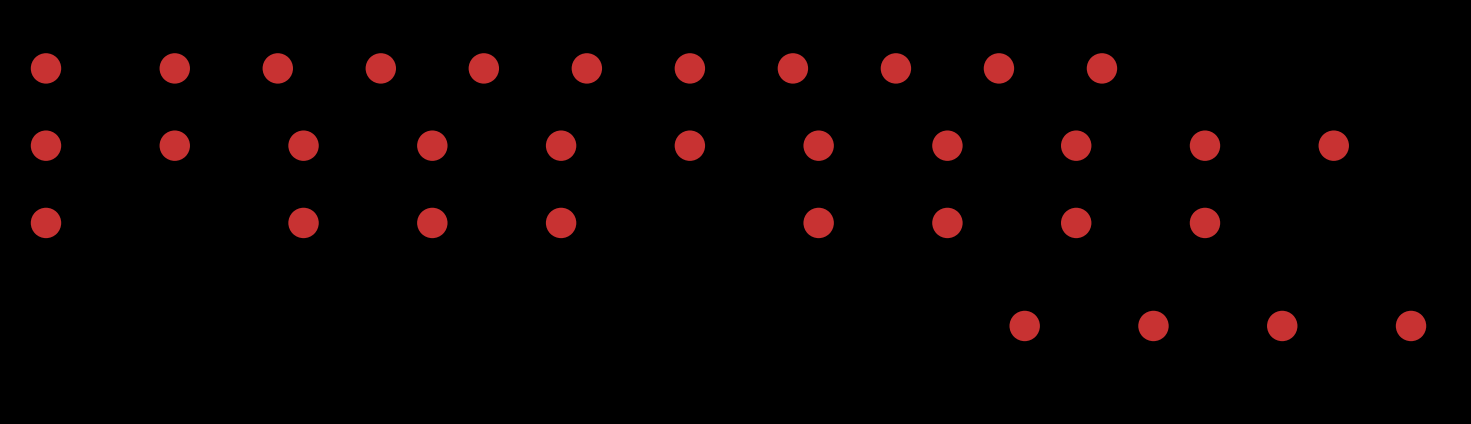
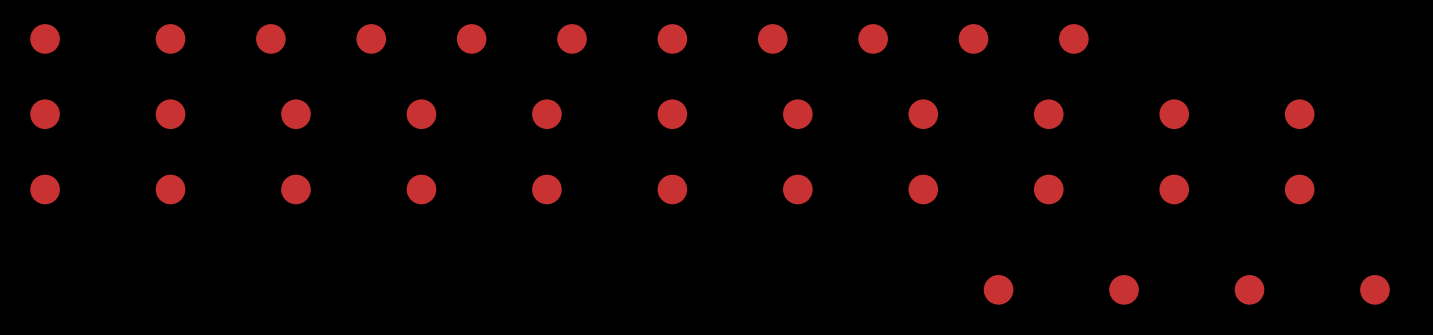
part: none -> (170, 189)
part: none -> (672, 189)
part: none -> (1299, 189)

